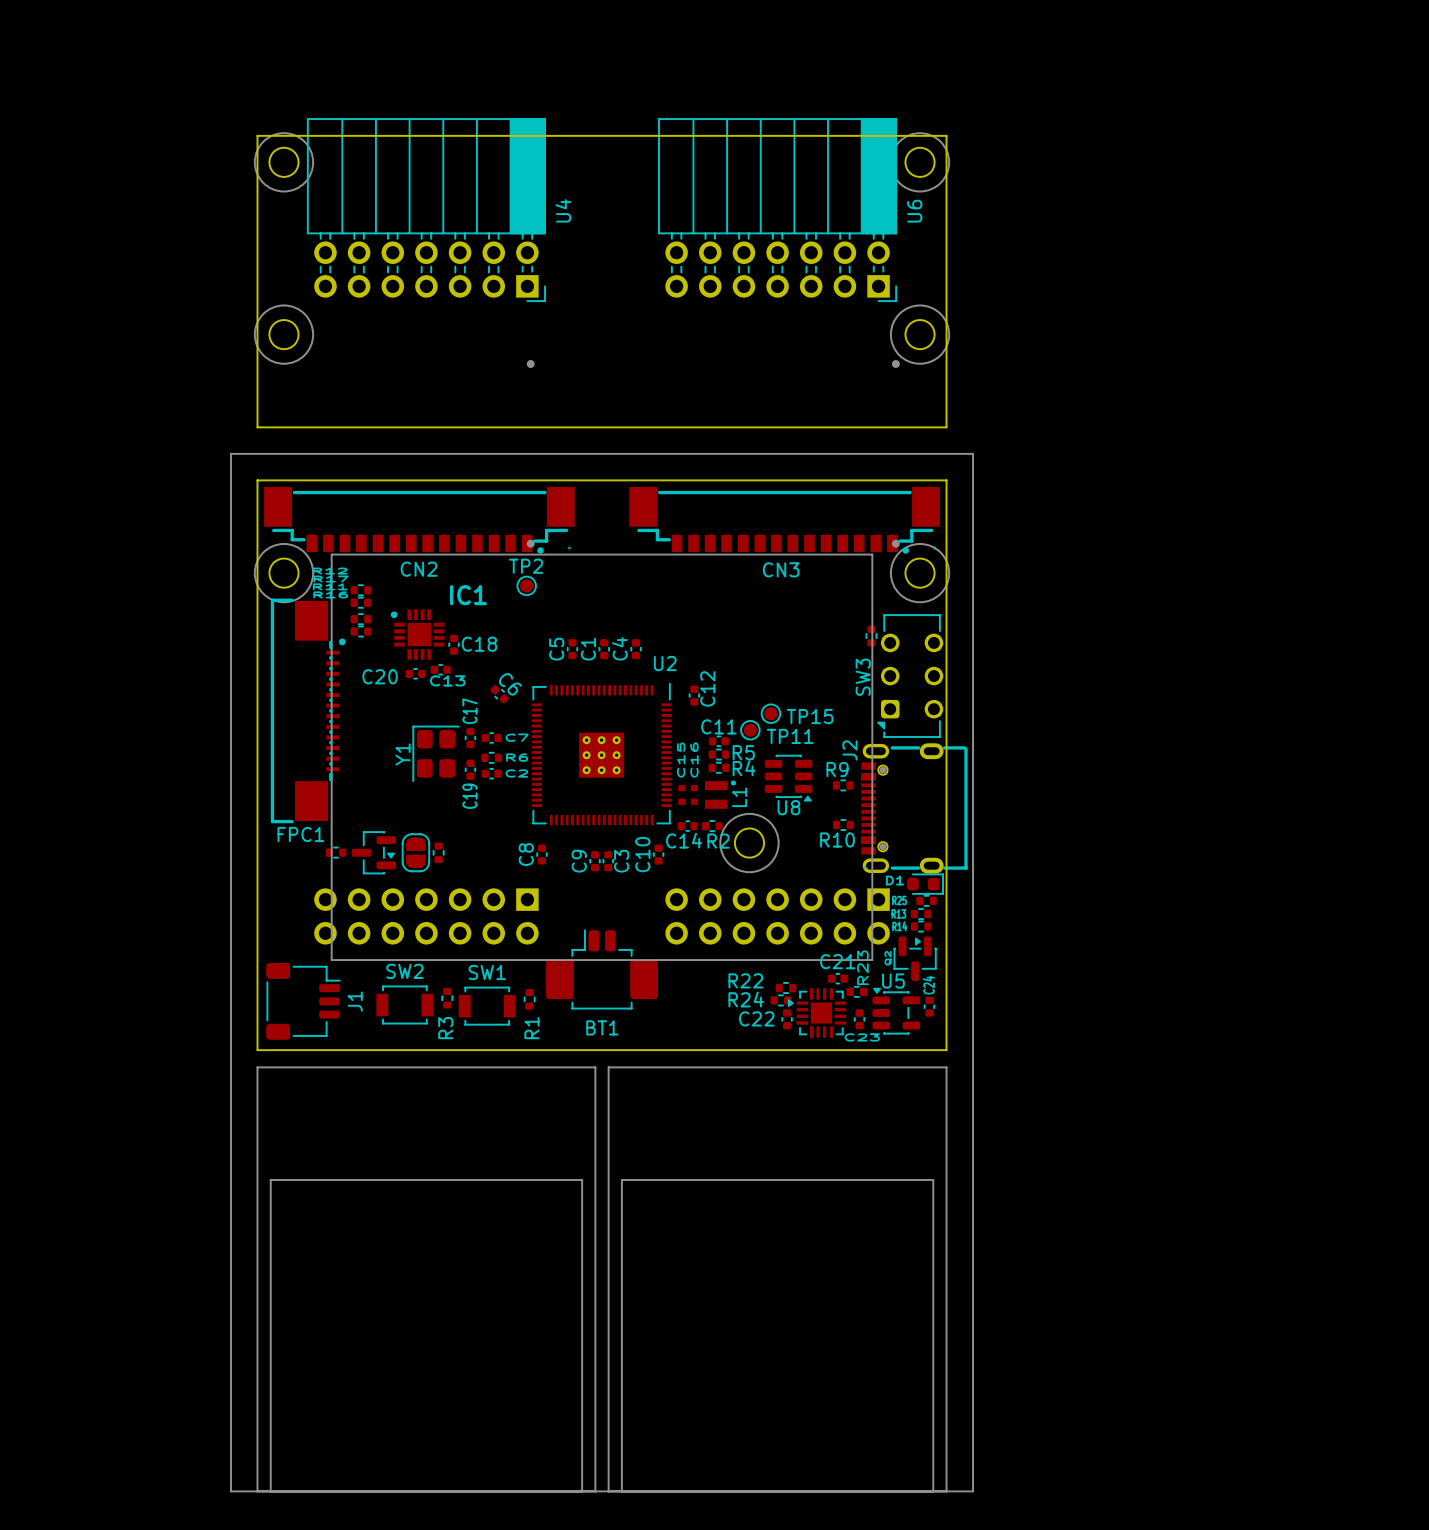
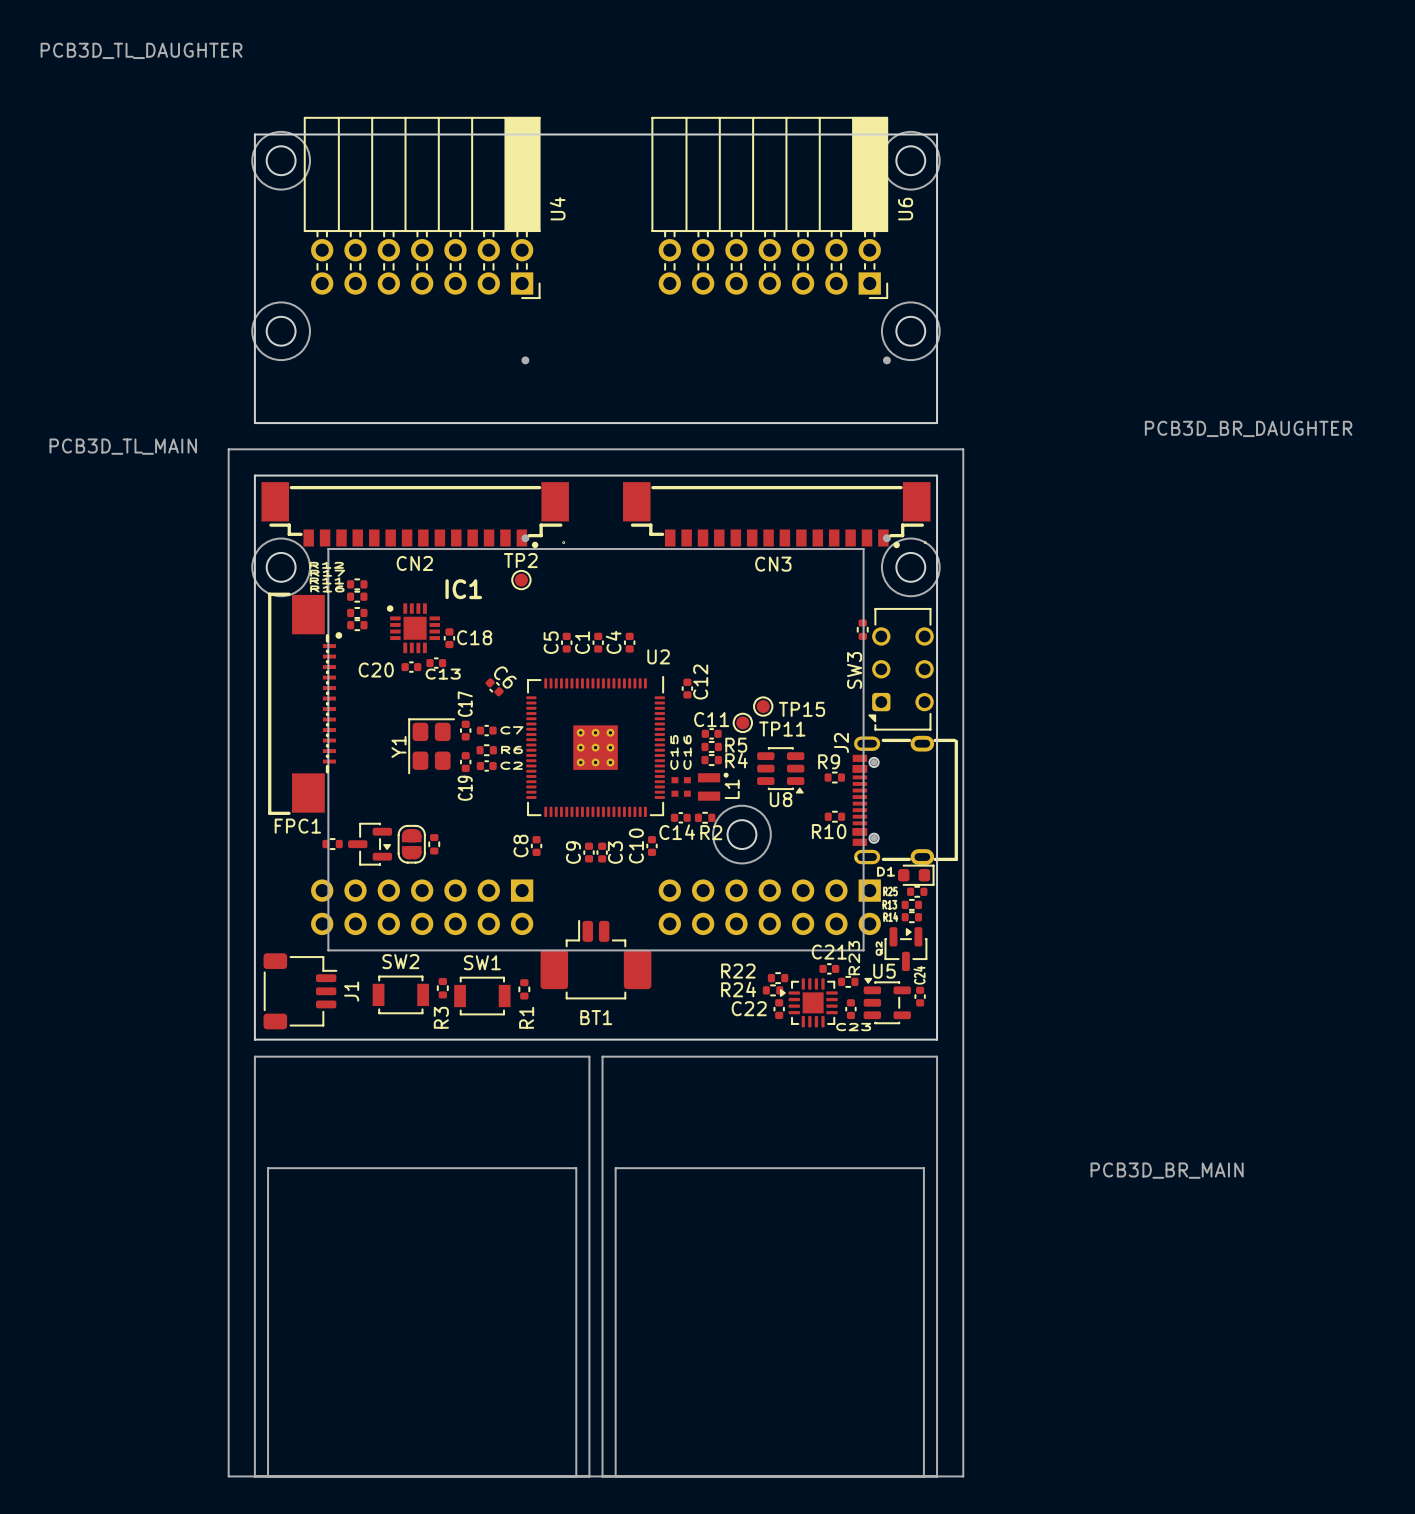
text: none -> PCB3D_TL_DAUGHTER (141, 50)
text: none -> PCB3D_BR_DAUGHTER (1248, 428)
text: none -> PCB3D_TL_MAIN (123, 446)
text: none -> PCB3D_BR_MAIN (1167, 1170)

